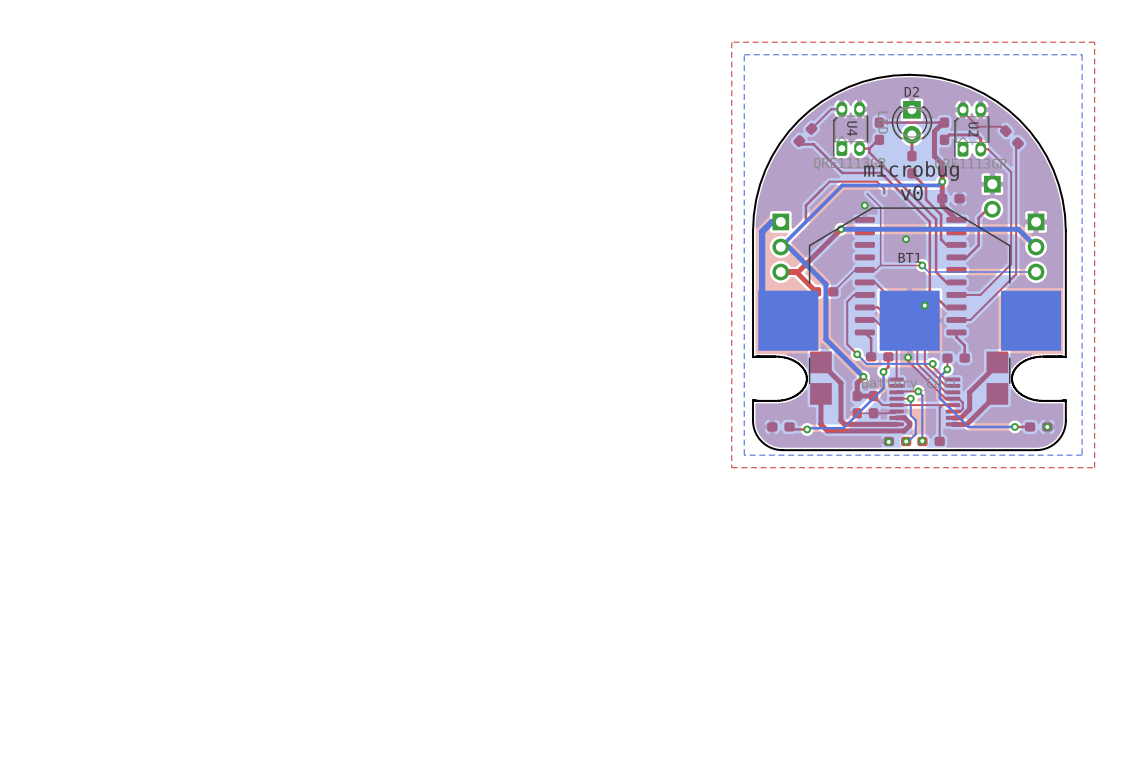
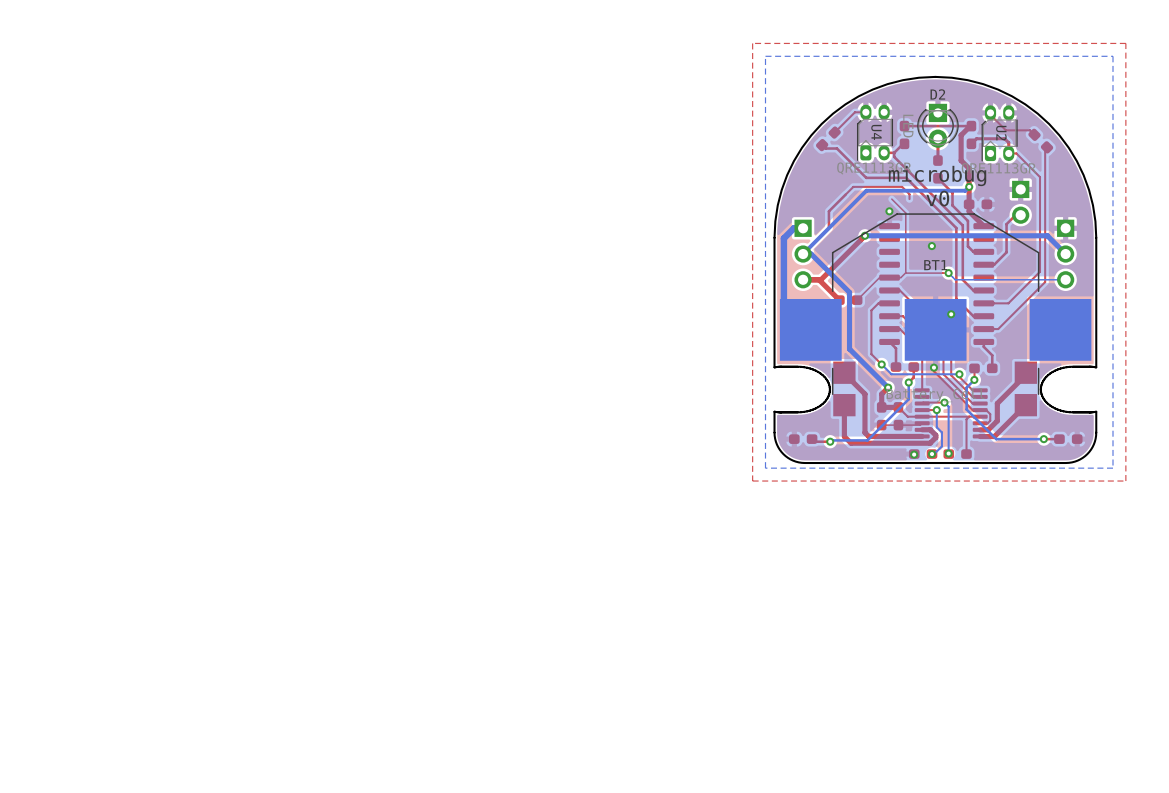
via: (1047, 426) -> none

